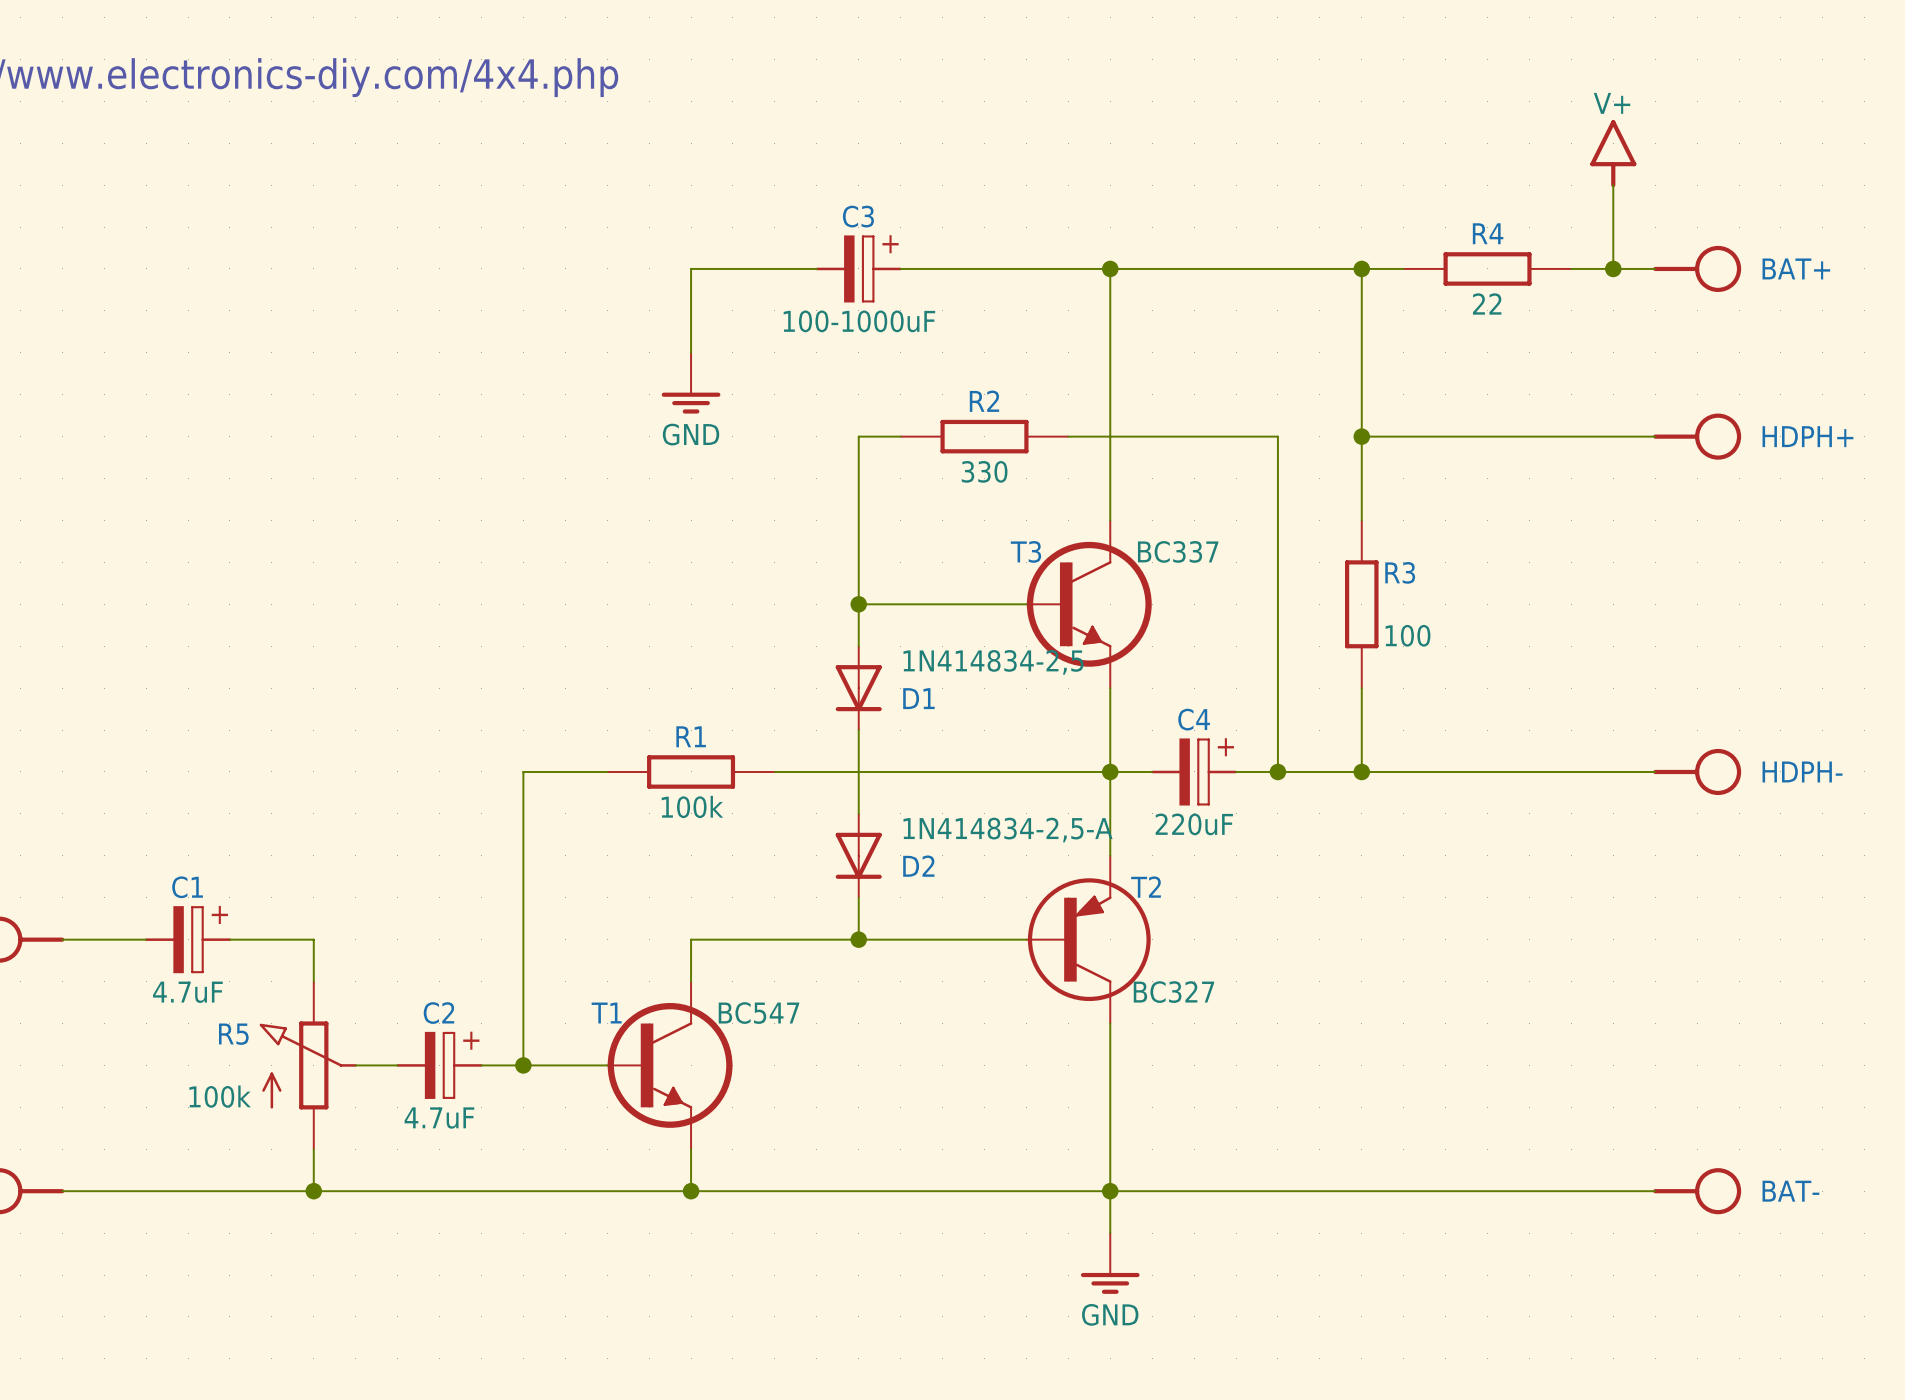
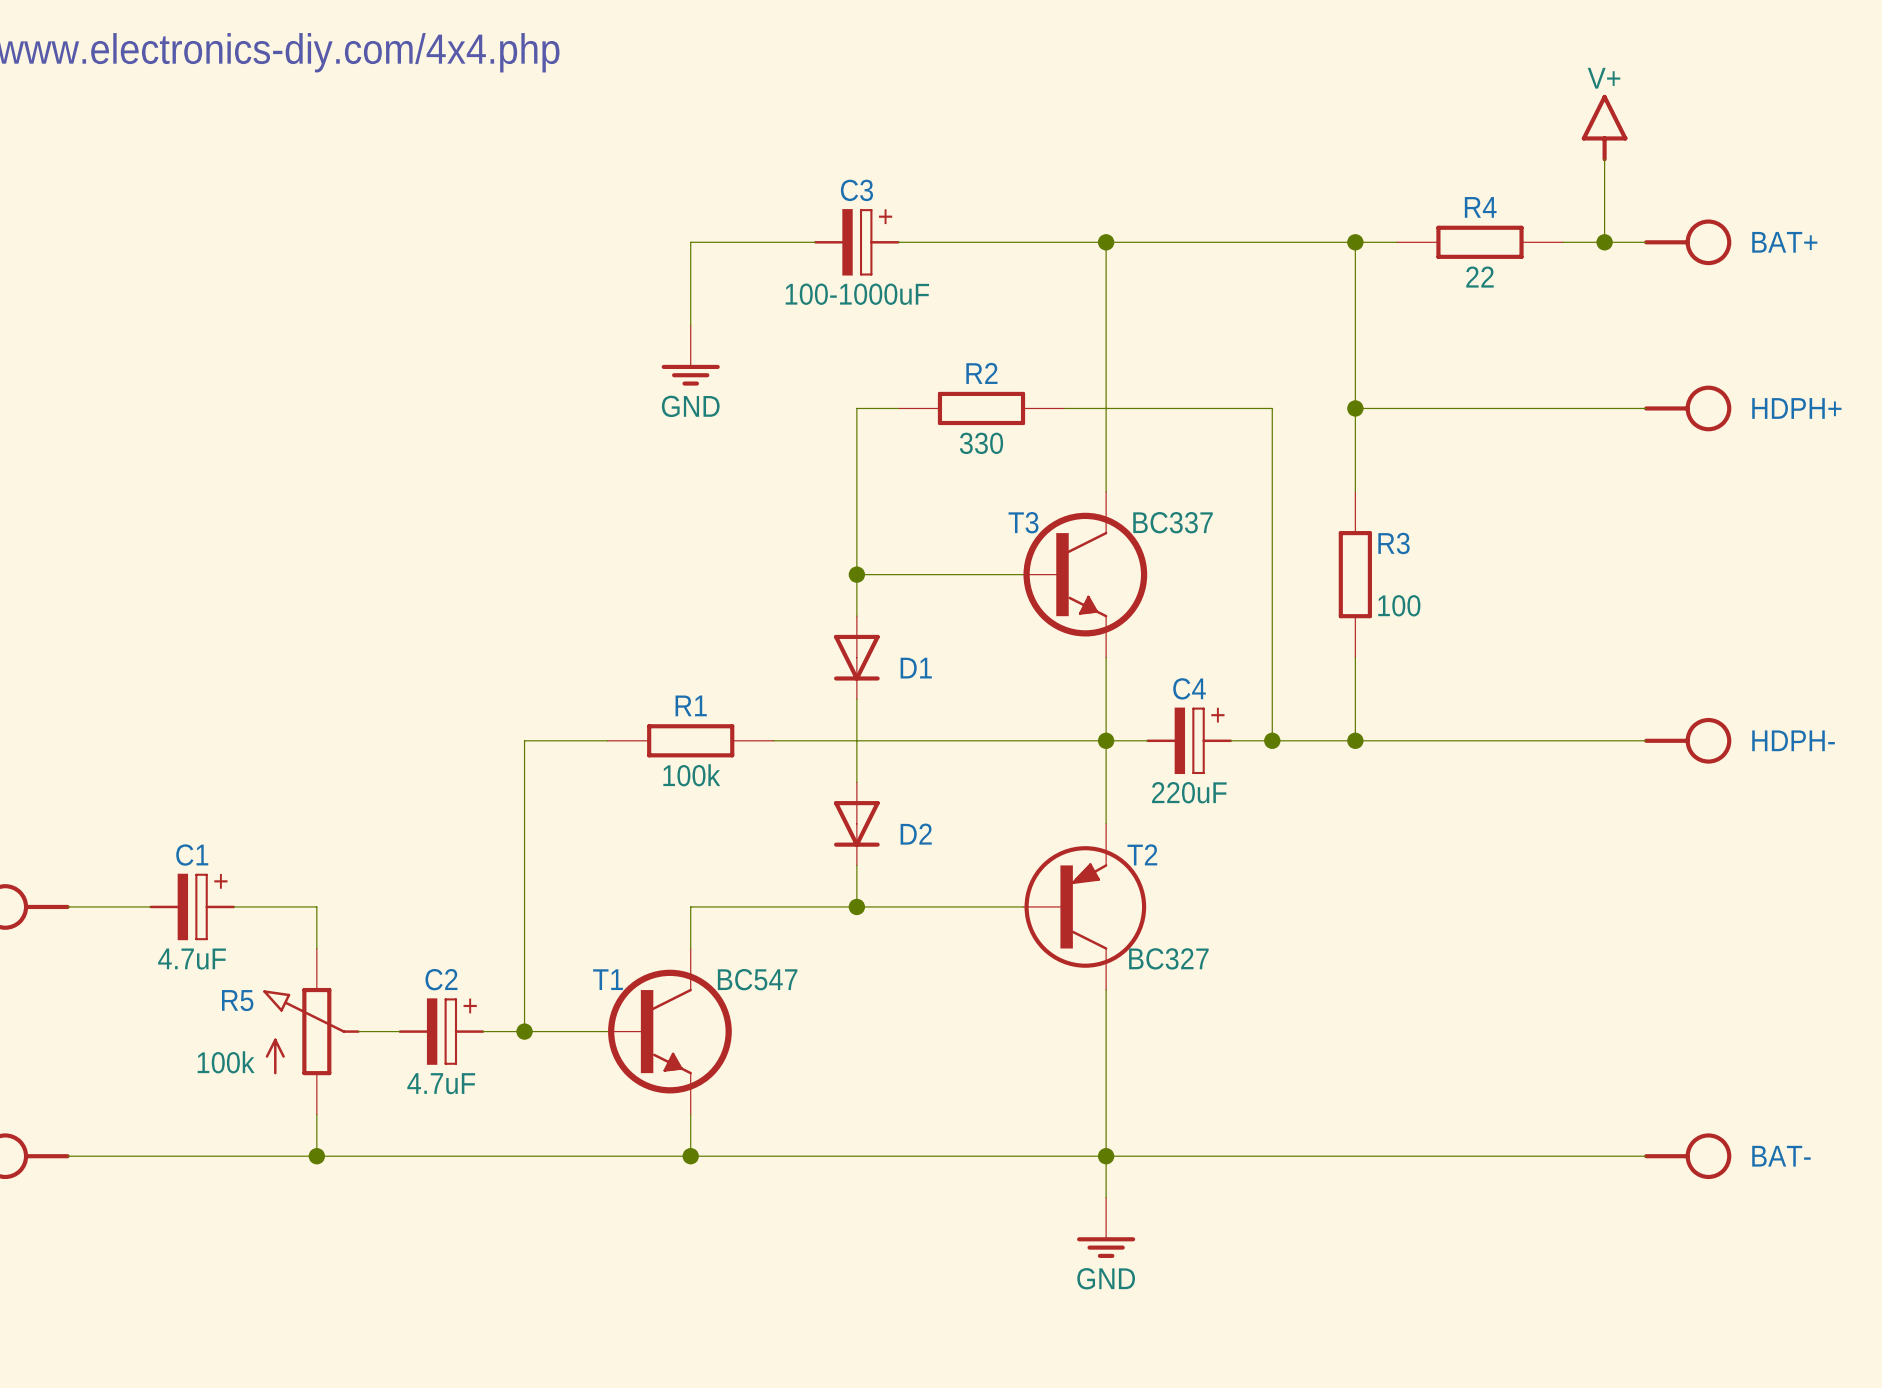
D1 value: 1N414834-2,5 (993, 662) -> none
D2 value: 1N414834-2,5-A (1008, 830) -> none

